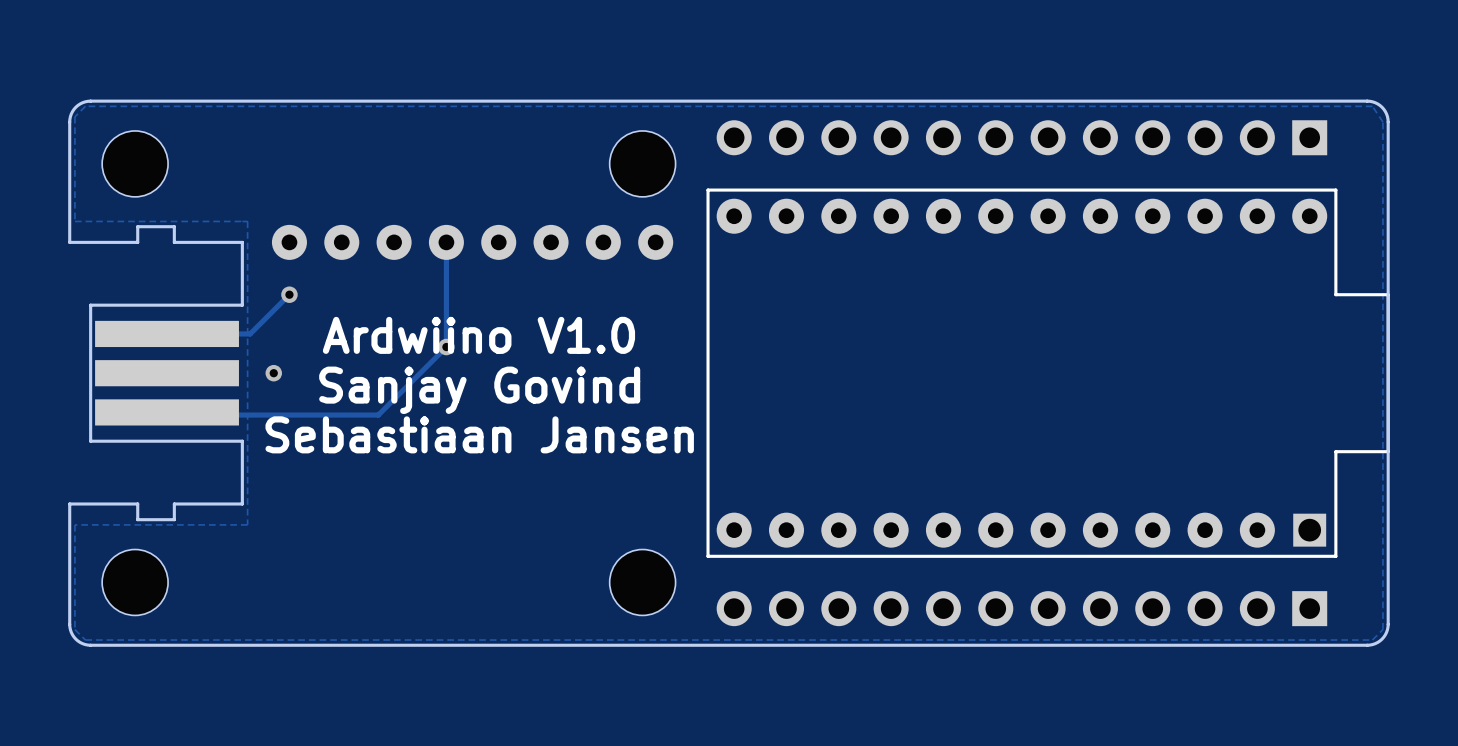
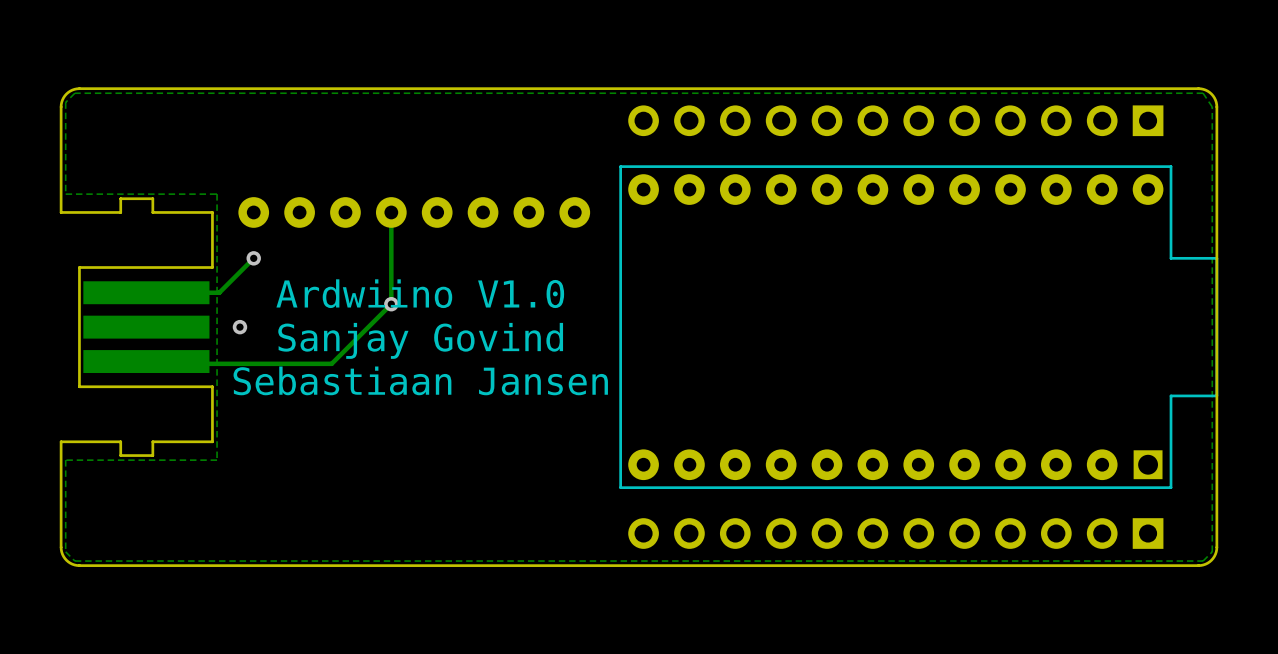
part: (135, 163) -> none
part: (642, 163) -> none
part: (135, 582) -> none
part: (642, 582) -> none

